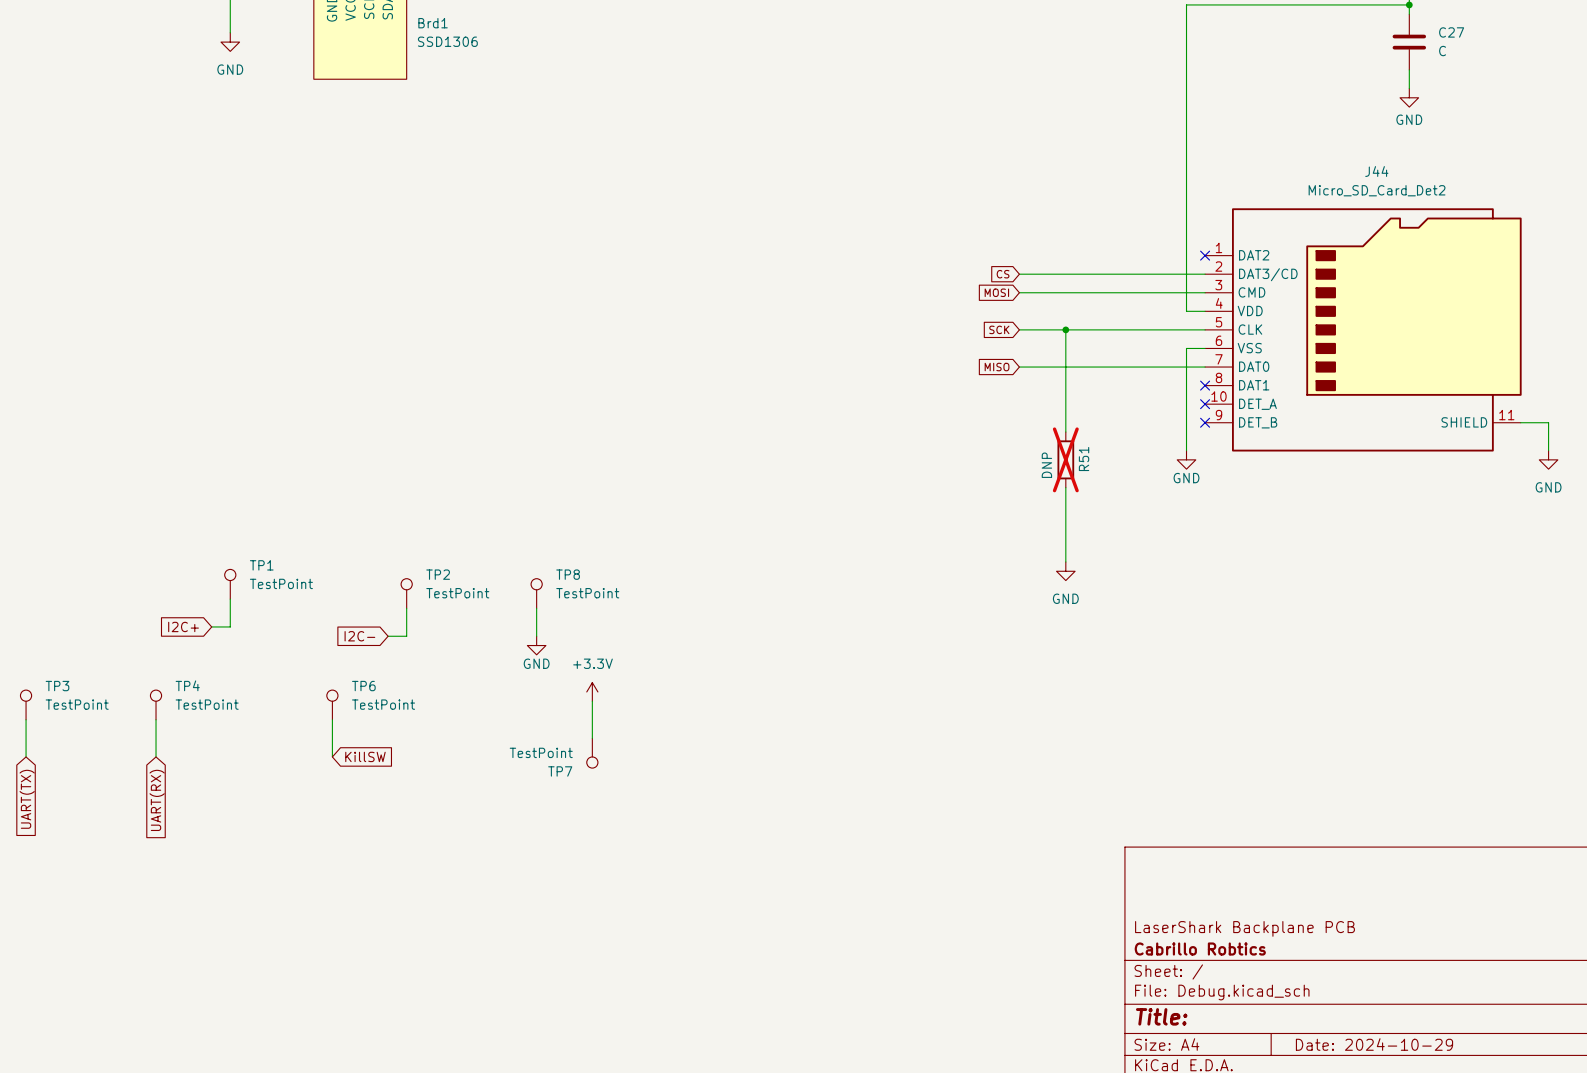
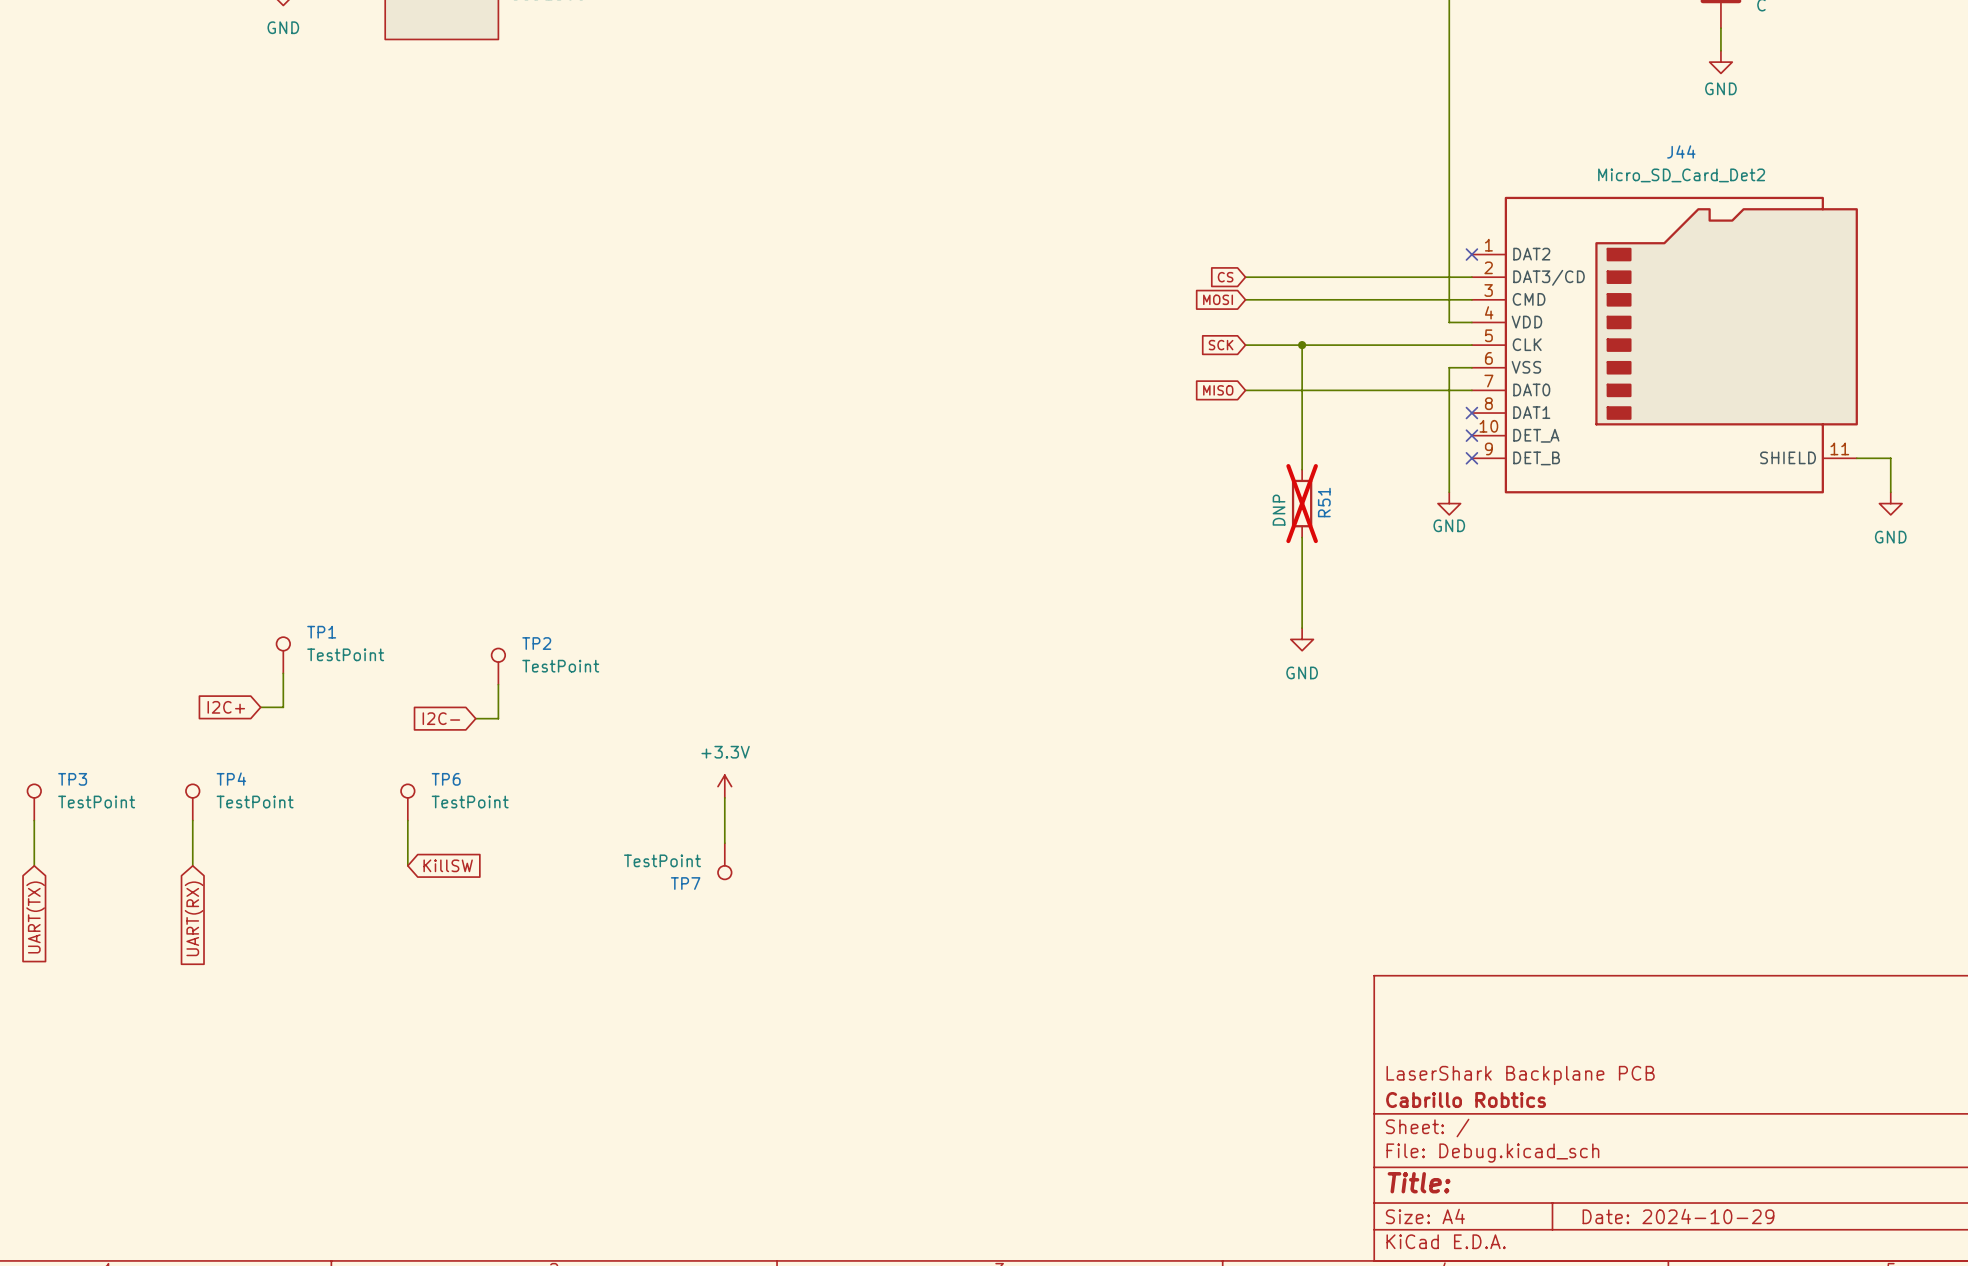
TP8: TestPoint (536, 593) -> none
wire: (536, 608) (536, 636) -> none
power symbol: GND (536, 645) -> none

